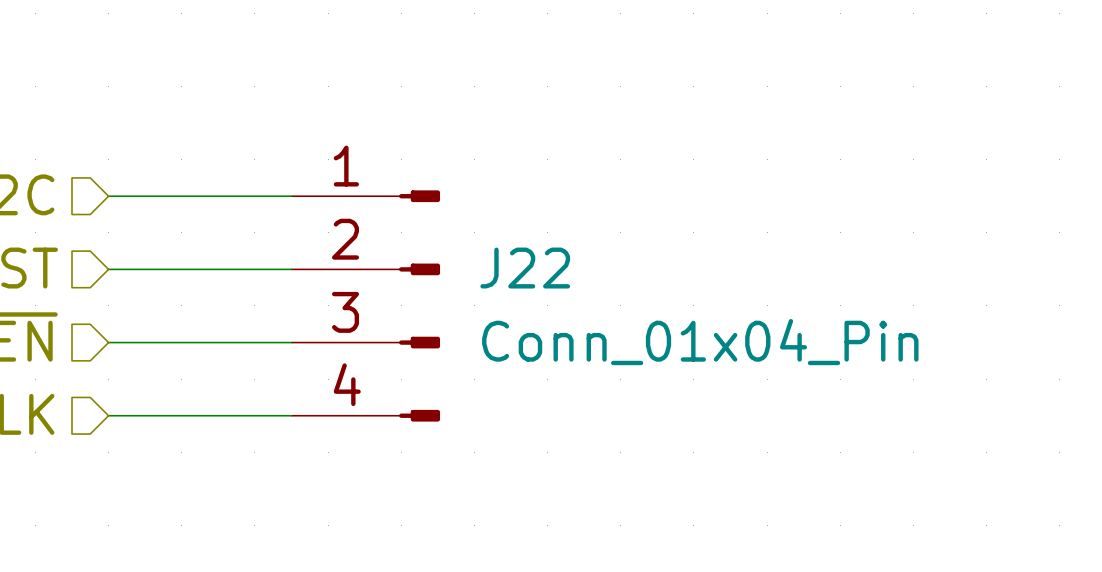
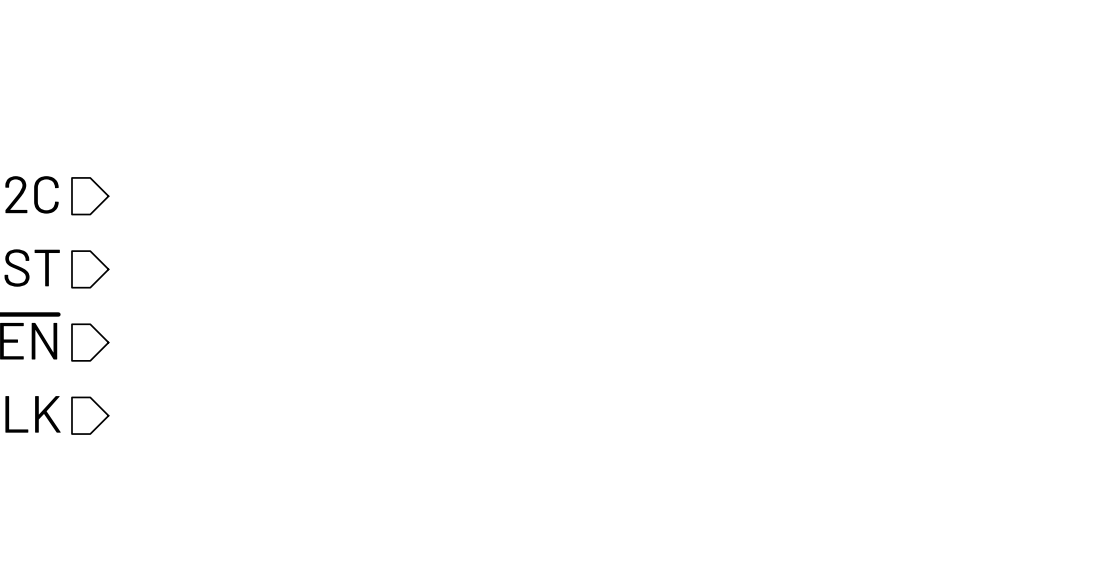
wire: (108, 196) (291, 196) -> none
wire: (108, 269) (291, 269) -> none
J22: Conn_01x04_Pin (365, 305) -> none
wire: (108, 342) (291, 342) -> none
wire: (108, 415) (291, 415) -> none

